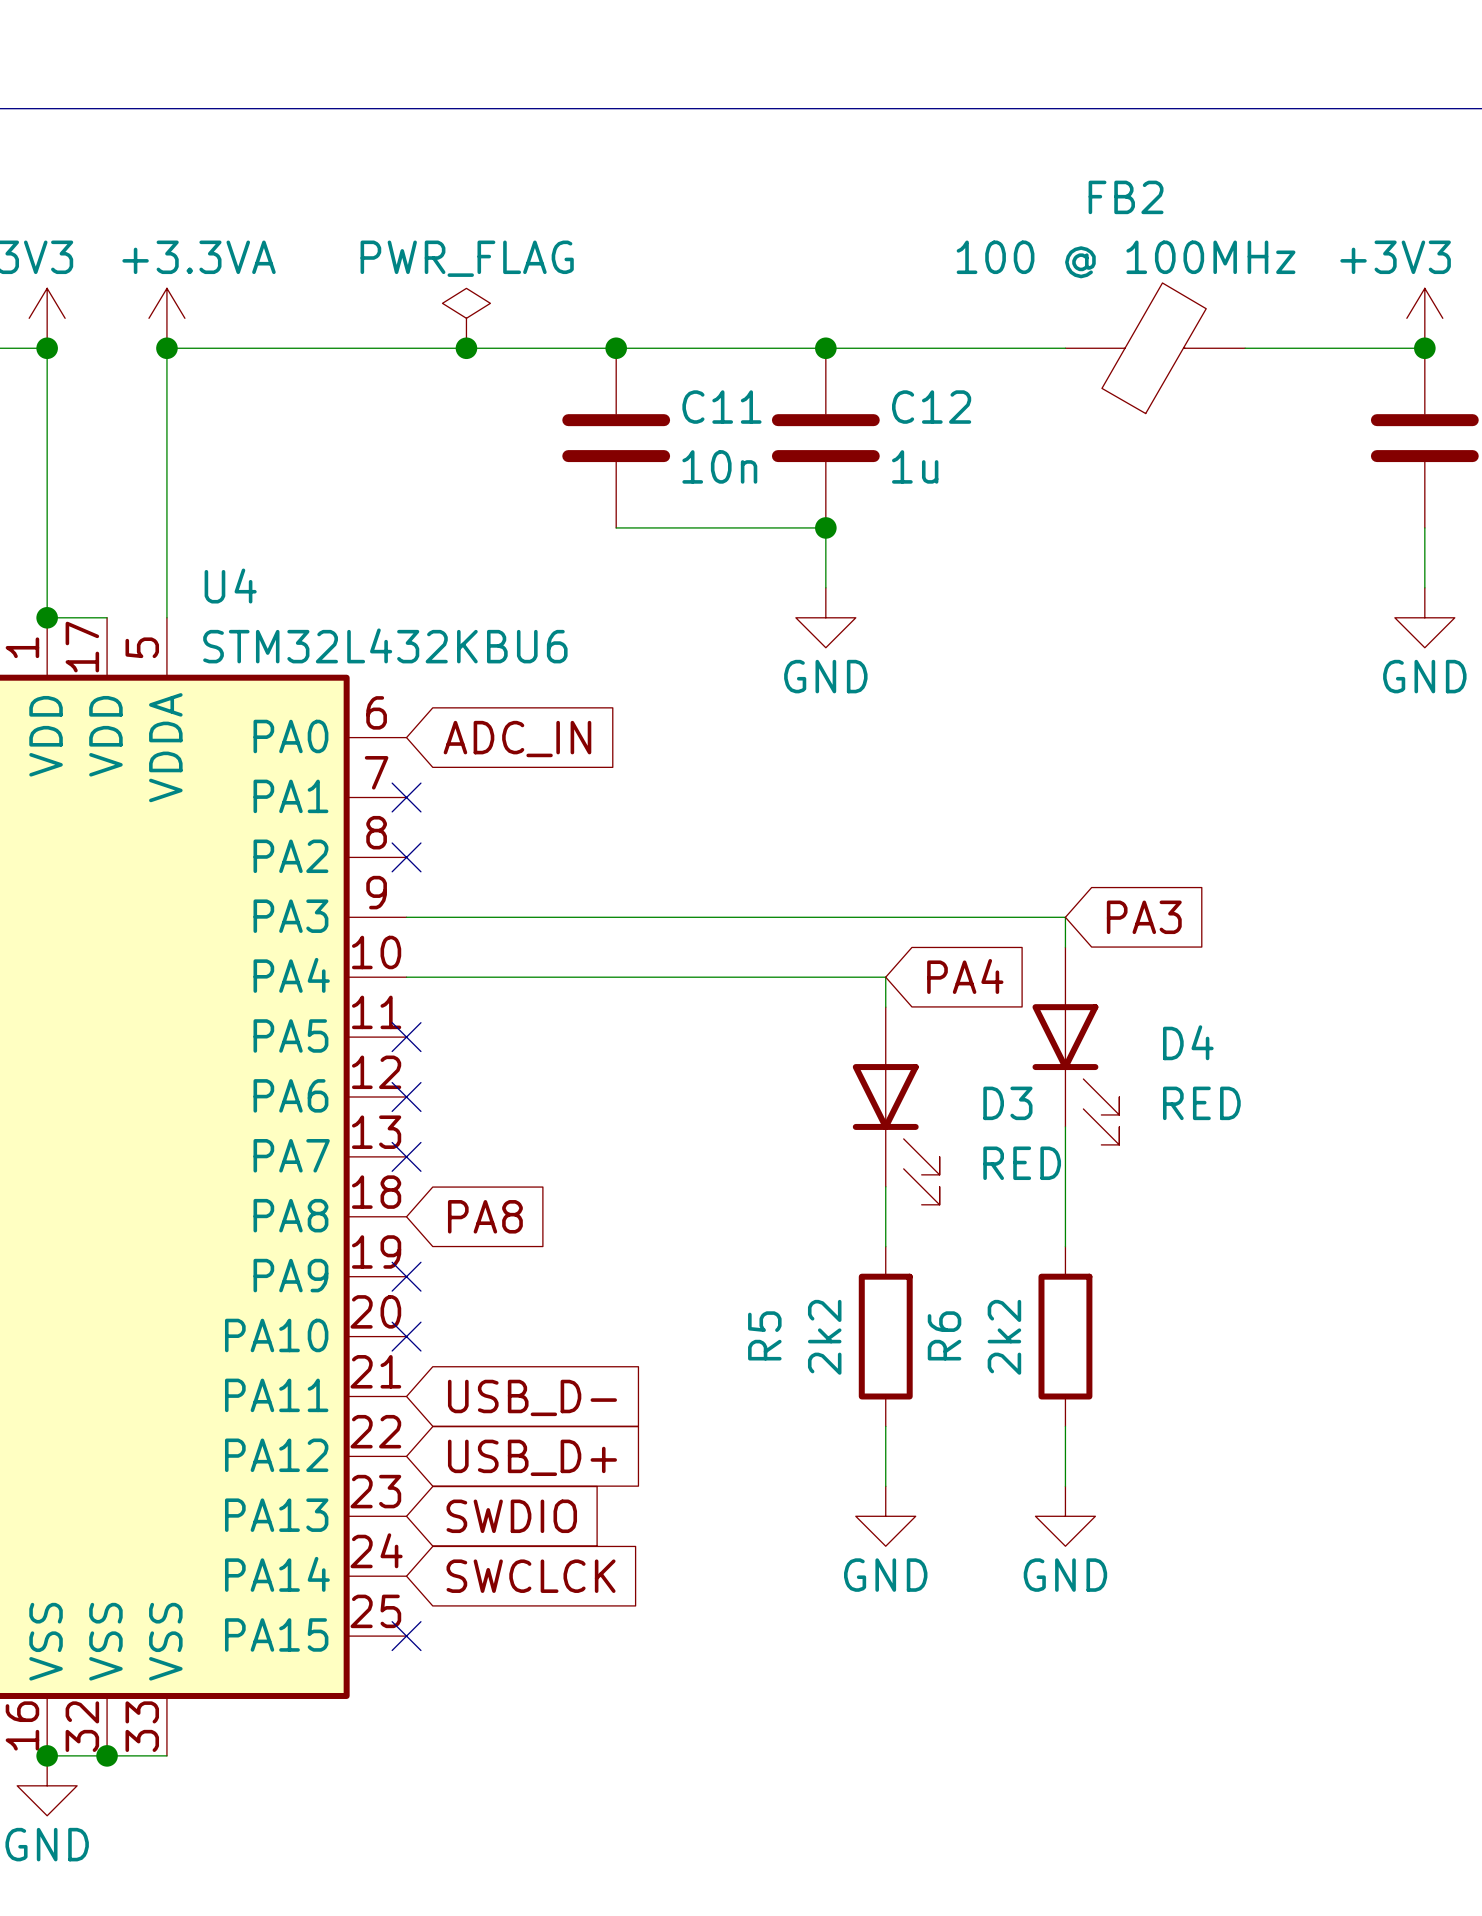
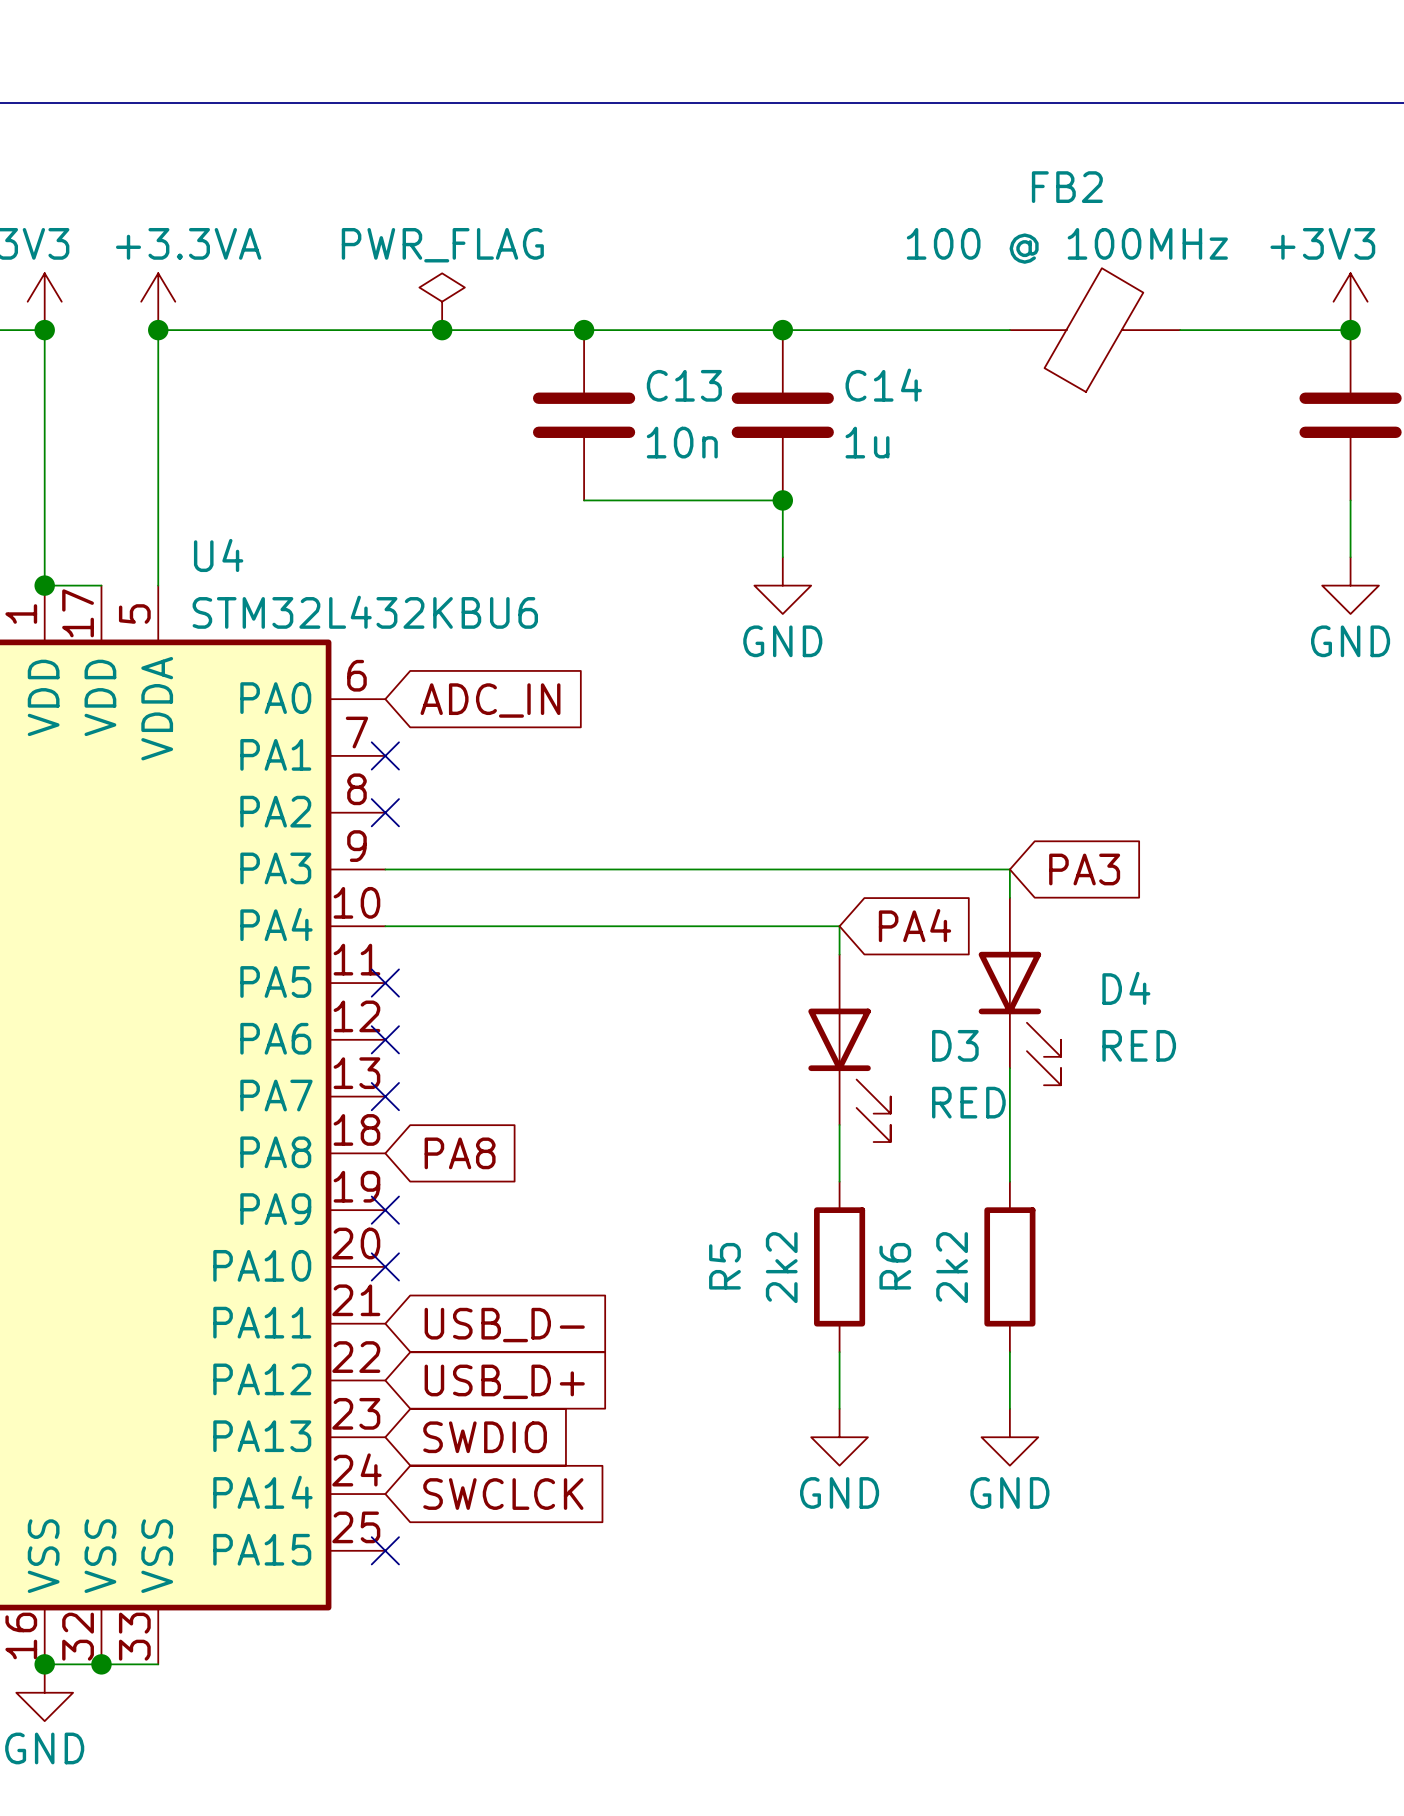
C11 name: C11 (721, 407) -> C13 (684, 385)
C12 name: C12 (931, 407) -> C14 (883, 385)

